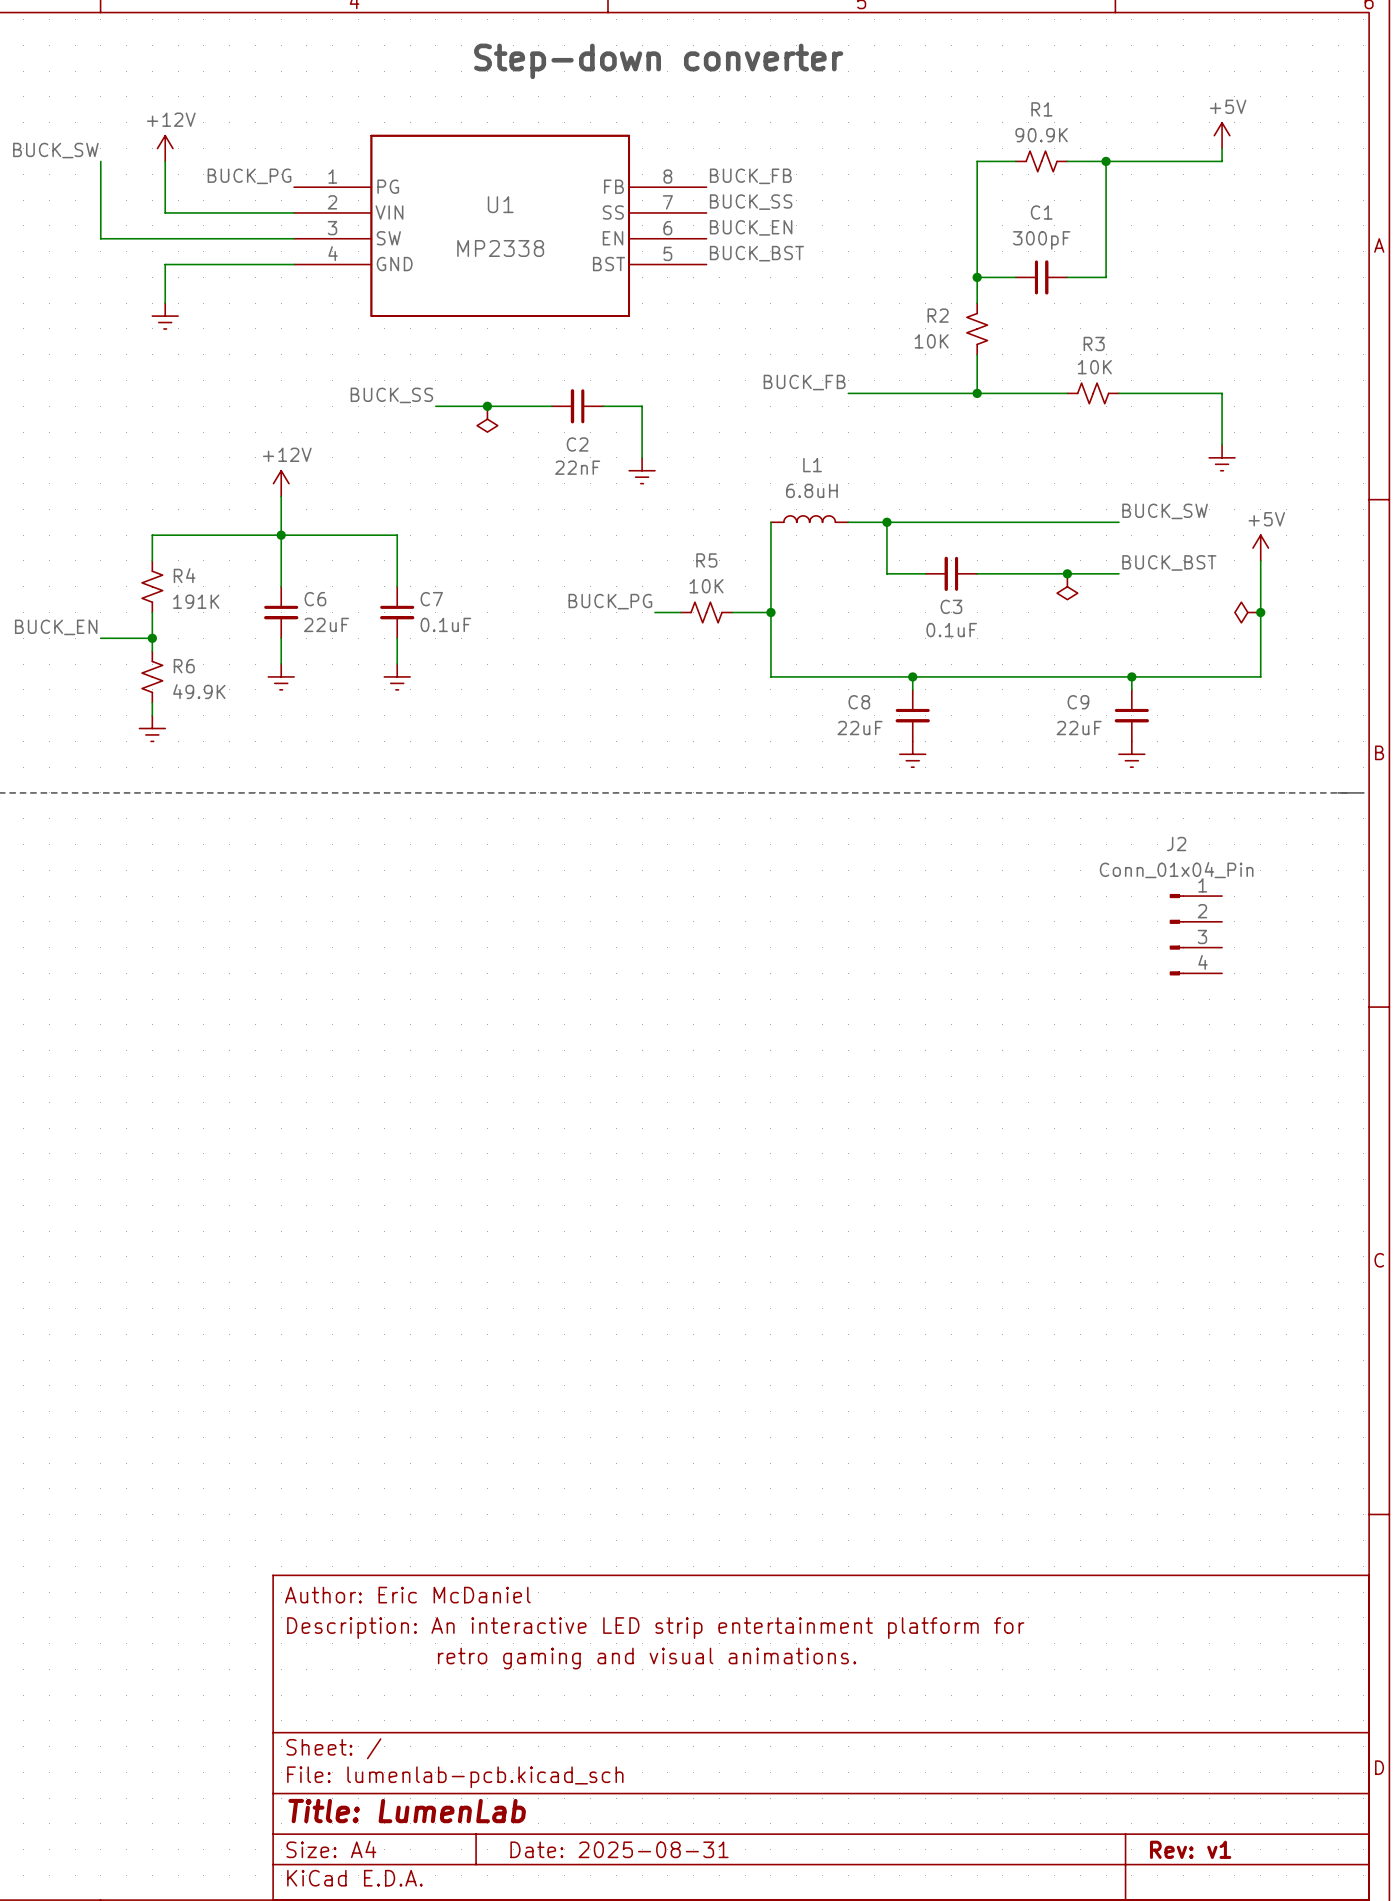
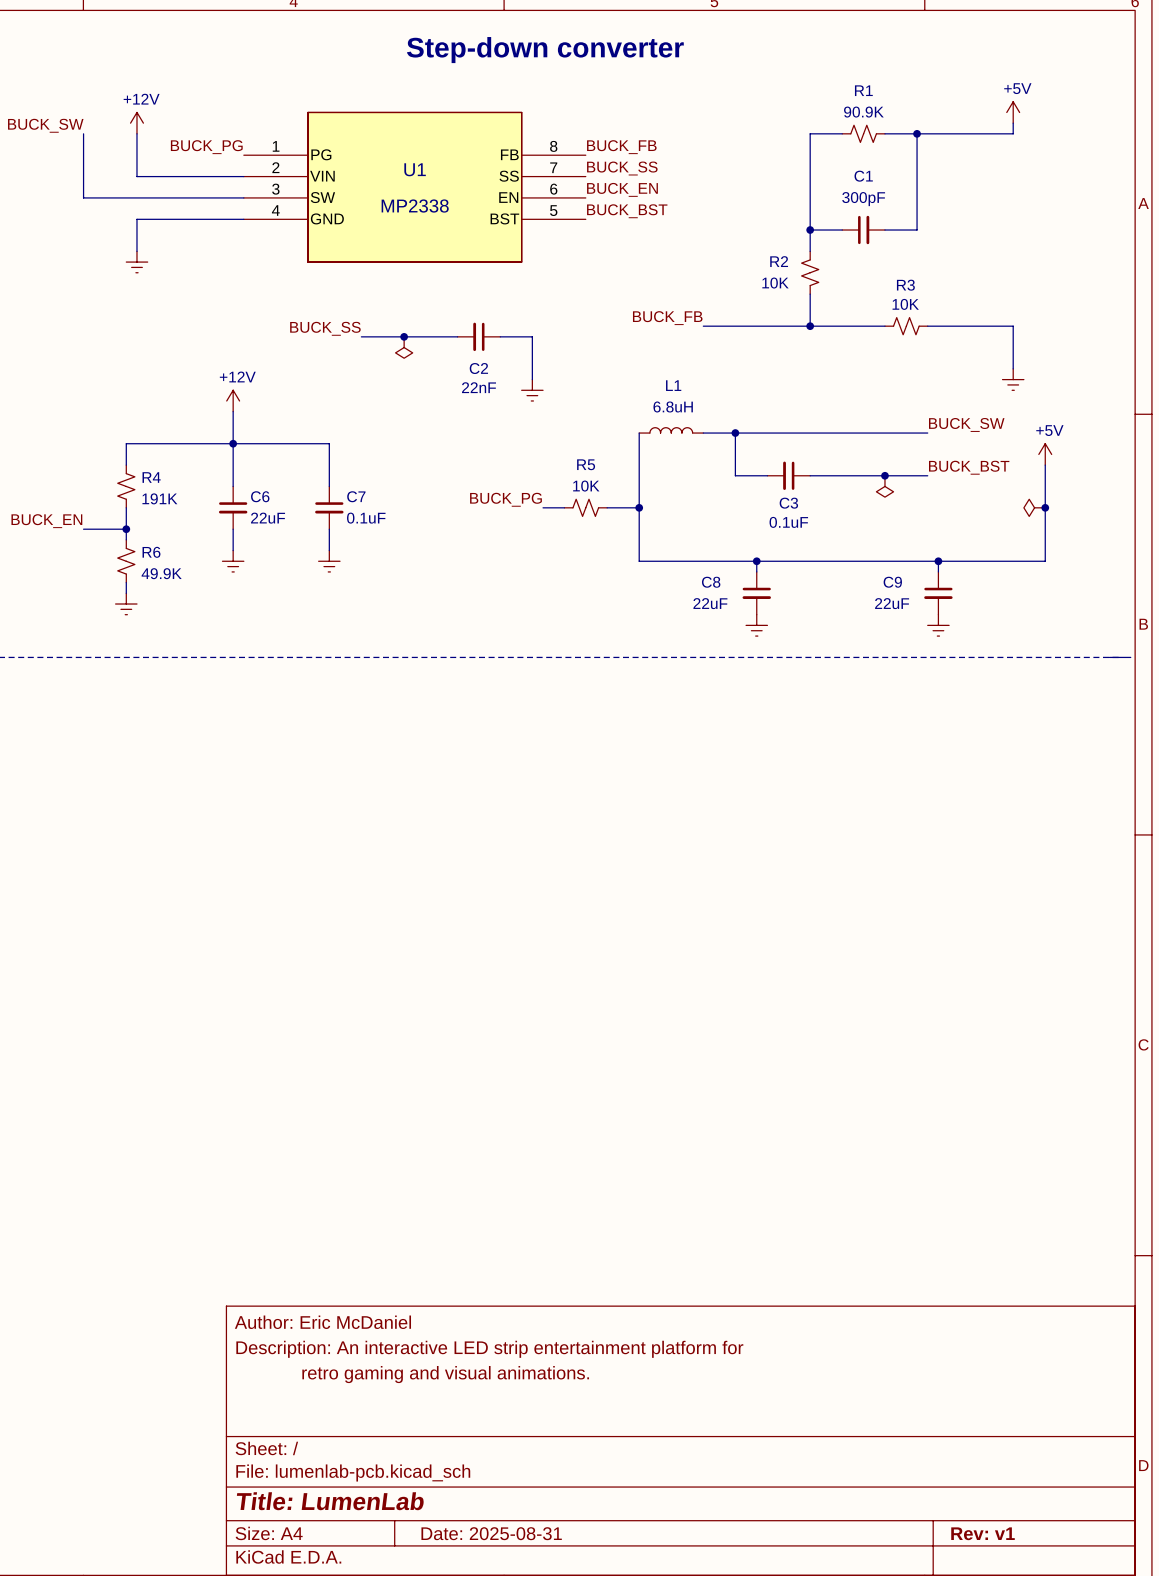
J2: Conn_01x04_Pin (1195, 934) -> none

